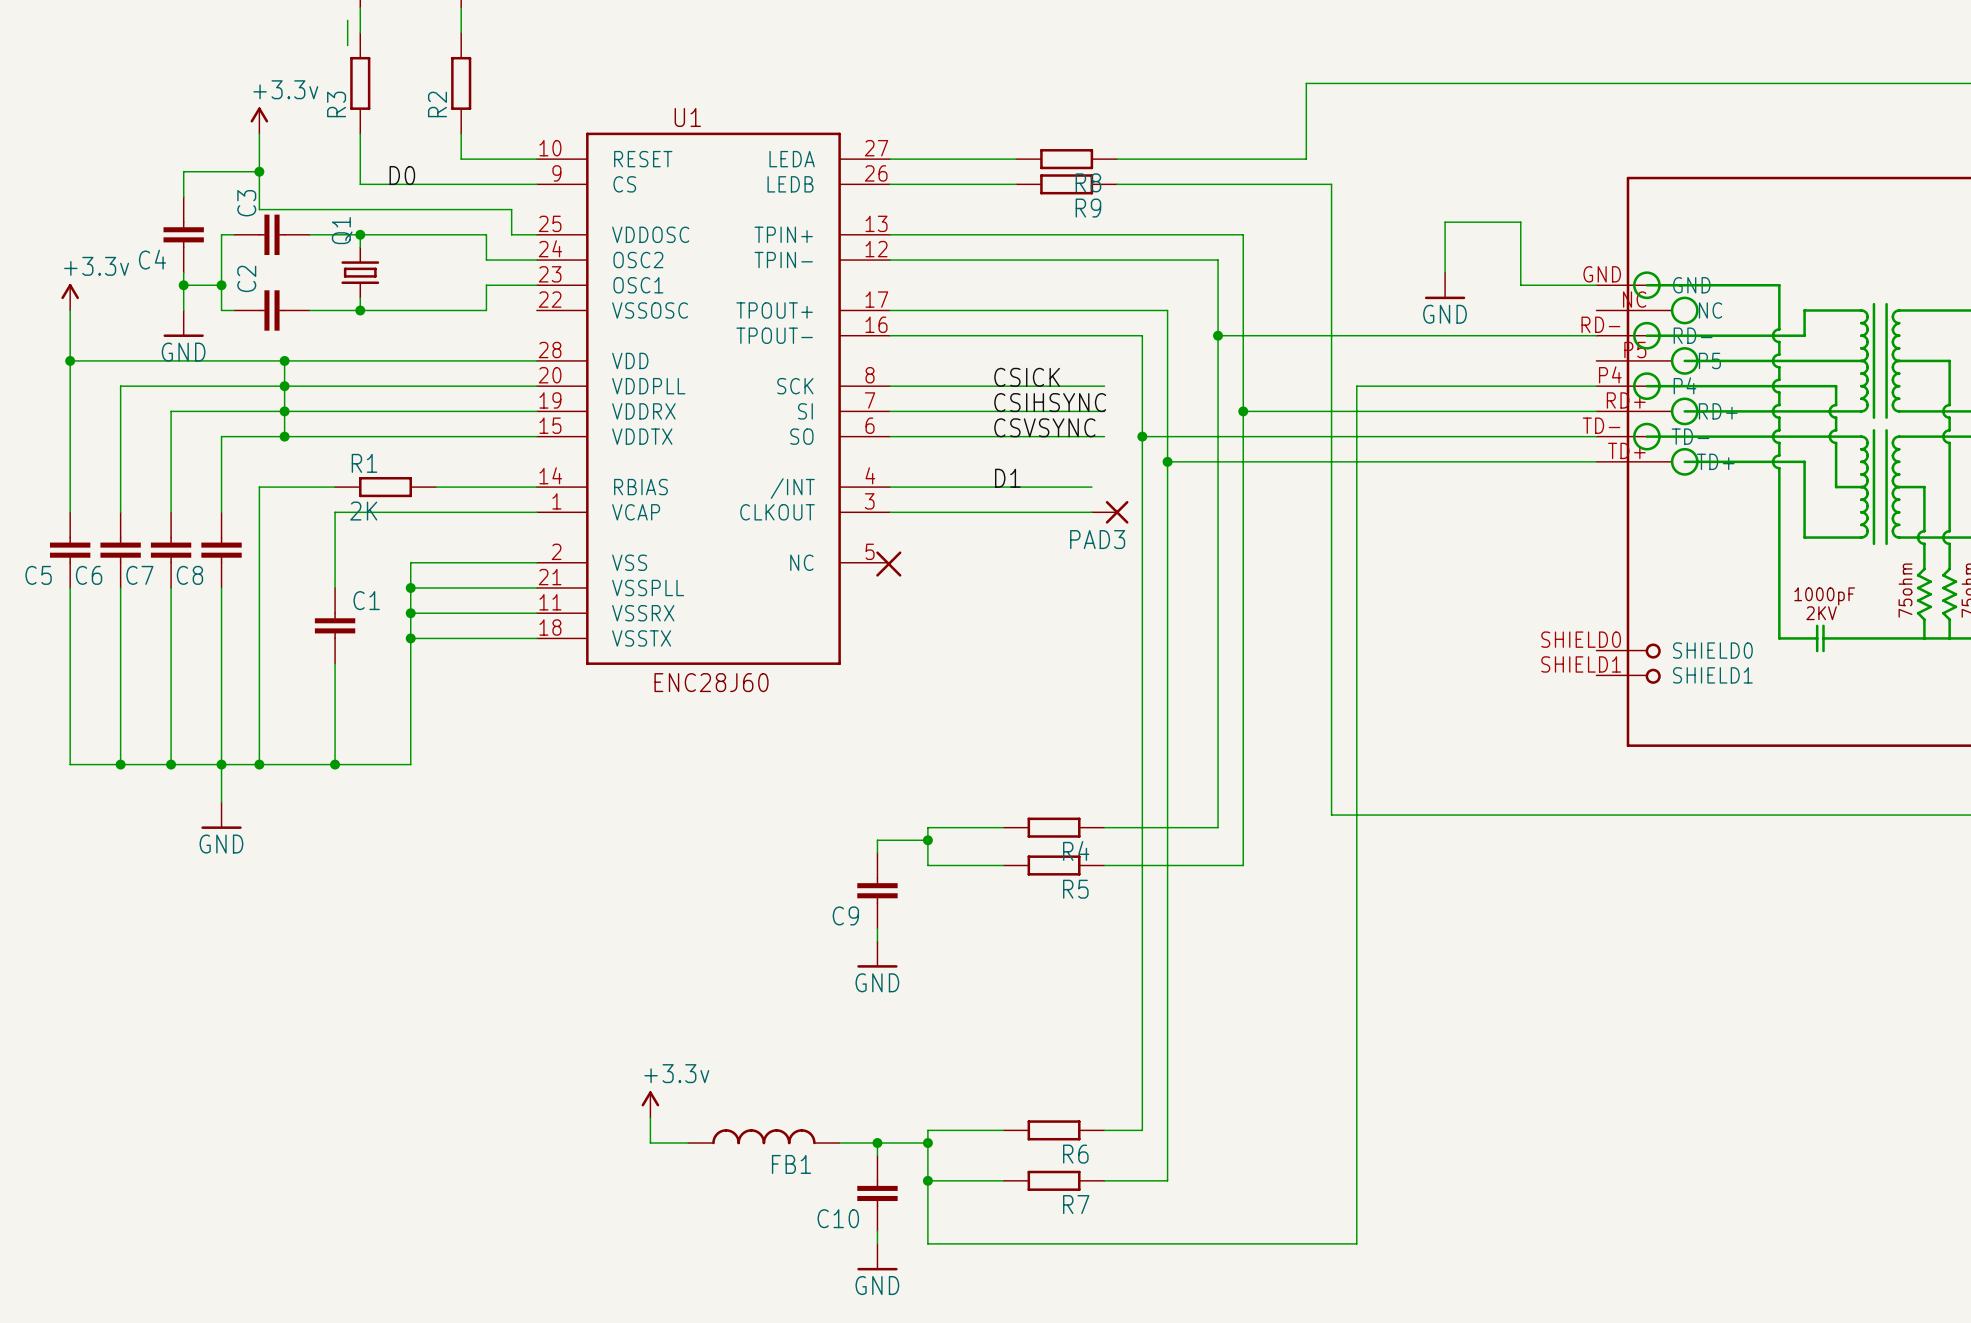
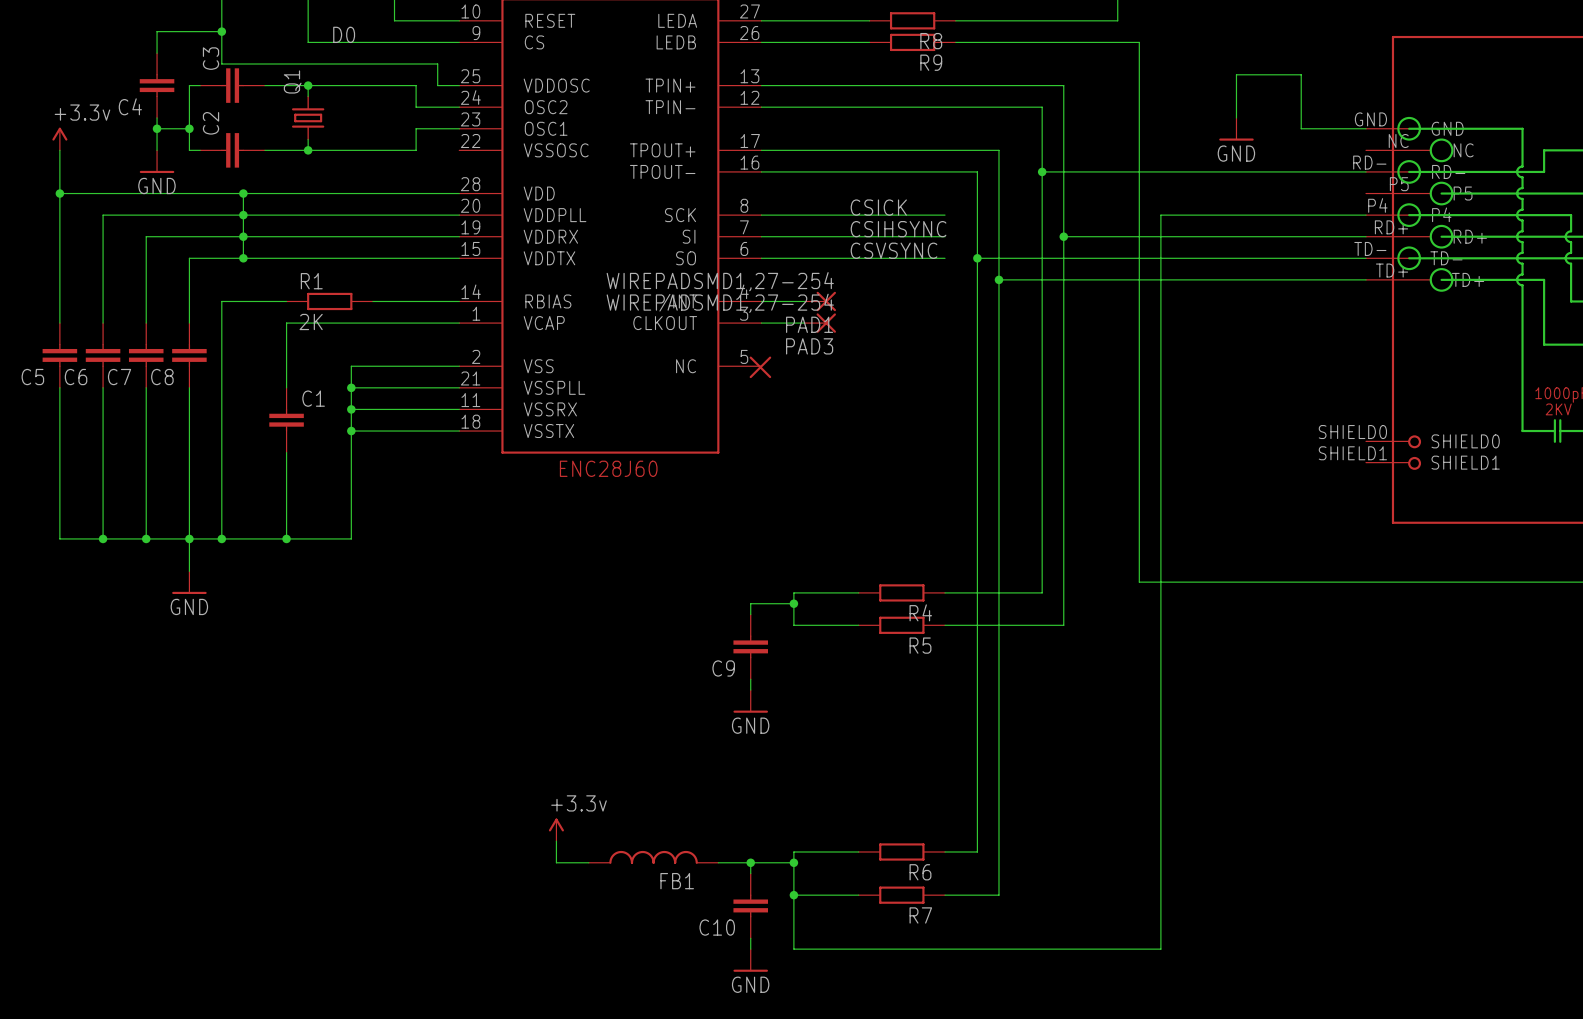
label: D1 (1007, 478) -> none
wire: (940, 487) (1091, 487) -> none
PAD1: none -> WIREPADSMD1,27-254 (820, 301)
PAD3 value: none -> WIREPADSMD1,27-254 (720, 303)
wire: (940, 512) (1091, 512) -> none
PAD3 position: (1110, 512) -> (820, 323)

